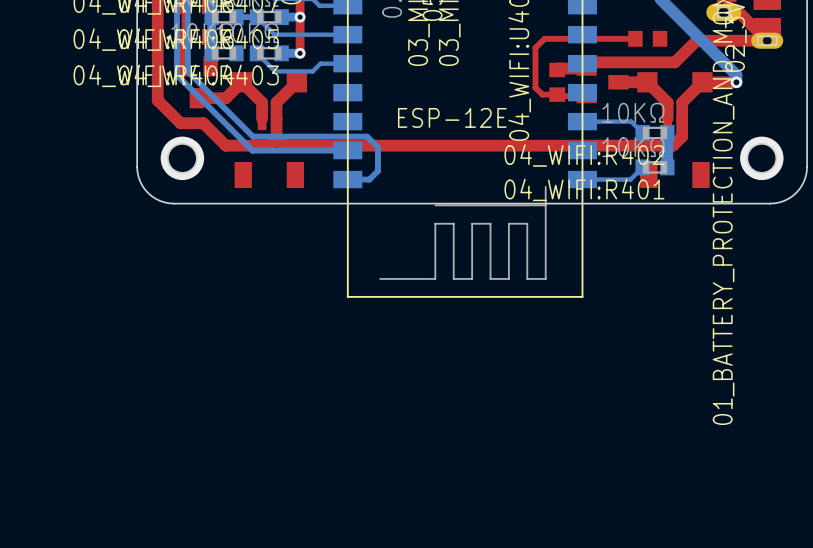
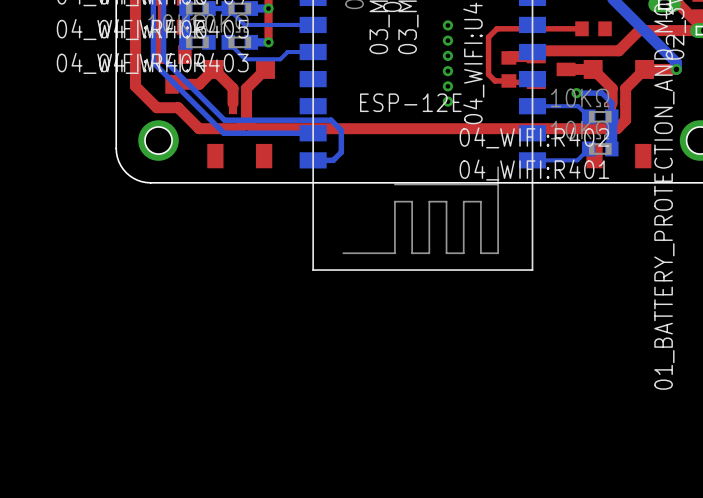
via: none -> (447, 25)
via: none -> (447, 40)
via: none -> (447, 55)
via: none -> (447, 71)
via: none -> (447, 86)
bottom track: none -> (576, 93) (601, 93) (611, 102) (611, 116)
via: none -> (576, 93)
via: none -> (447, 101)

